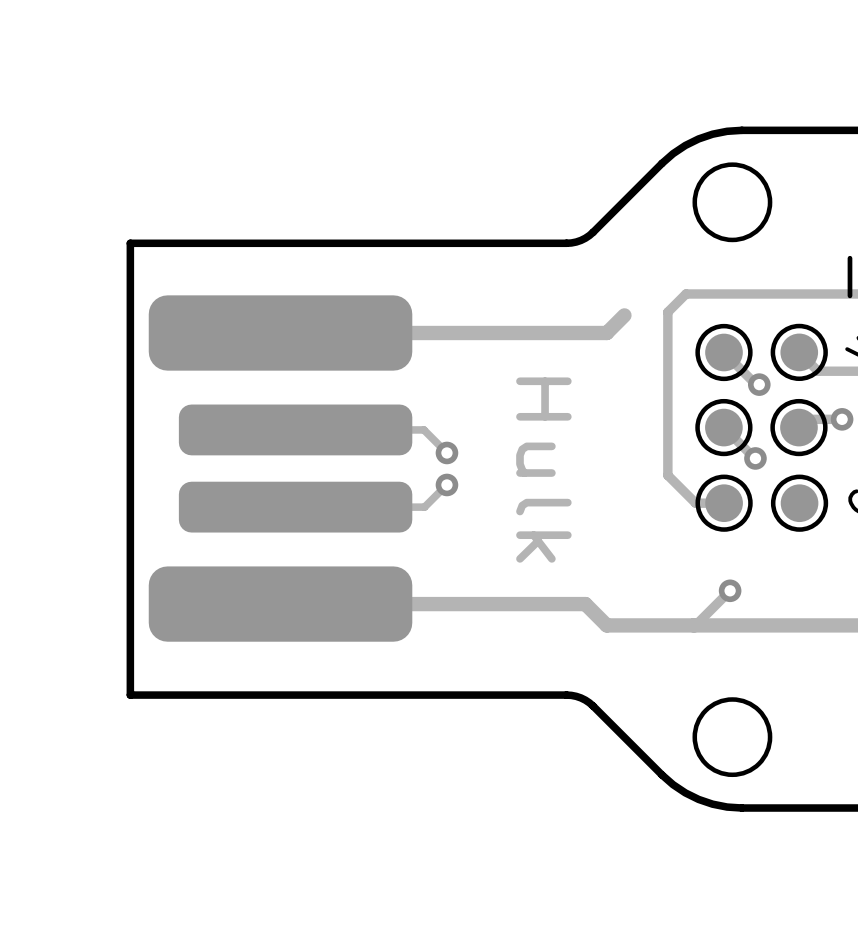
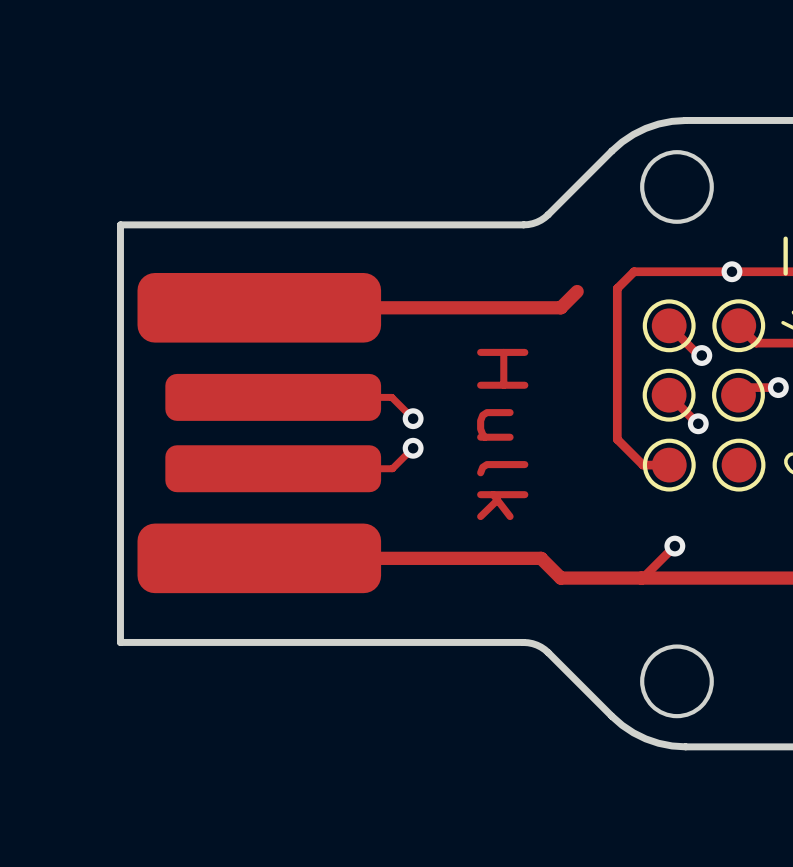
via: none -> (731, 271)

